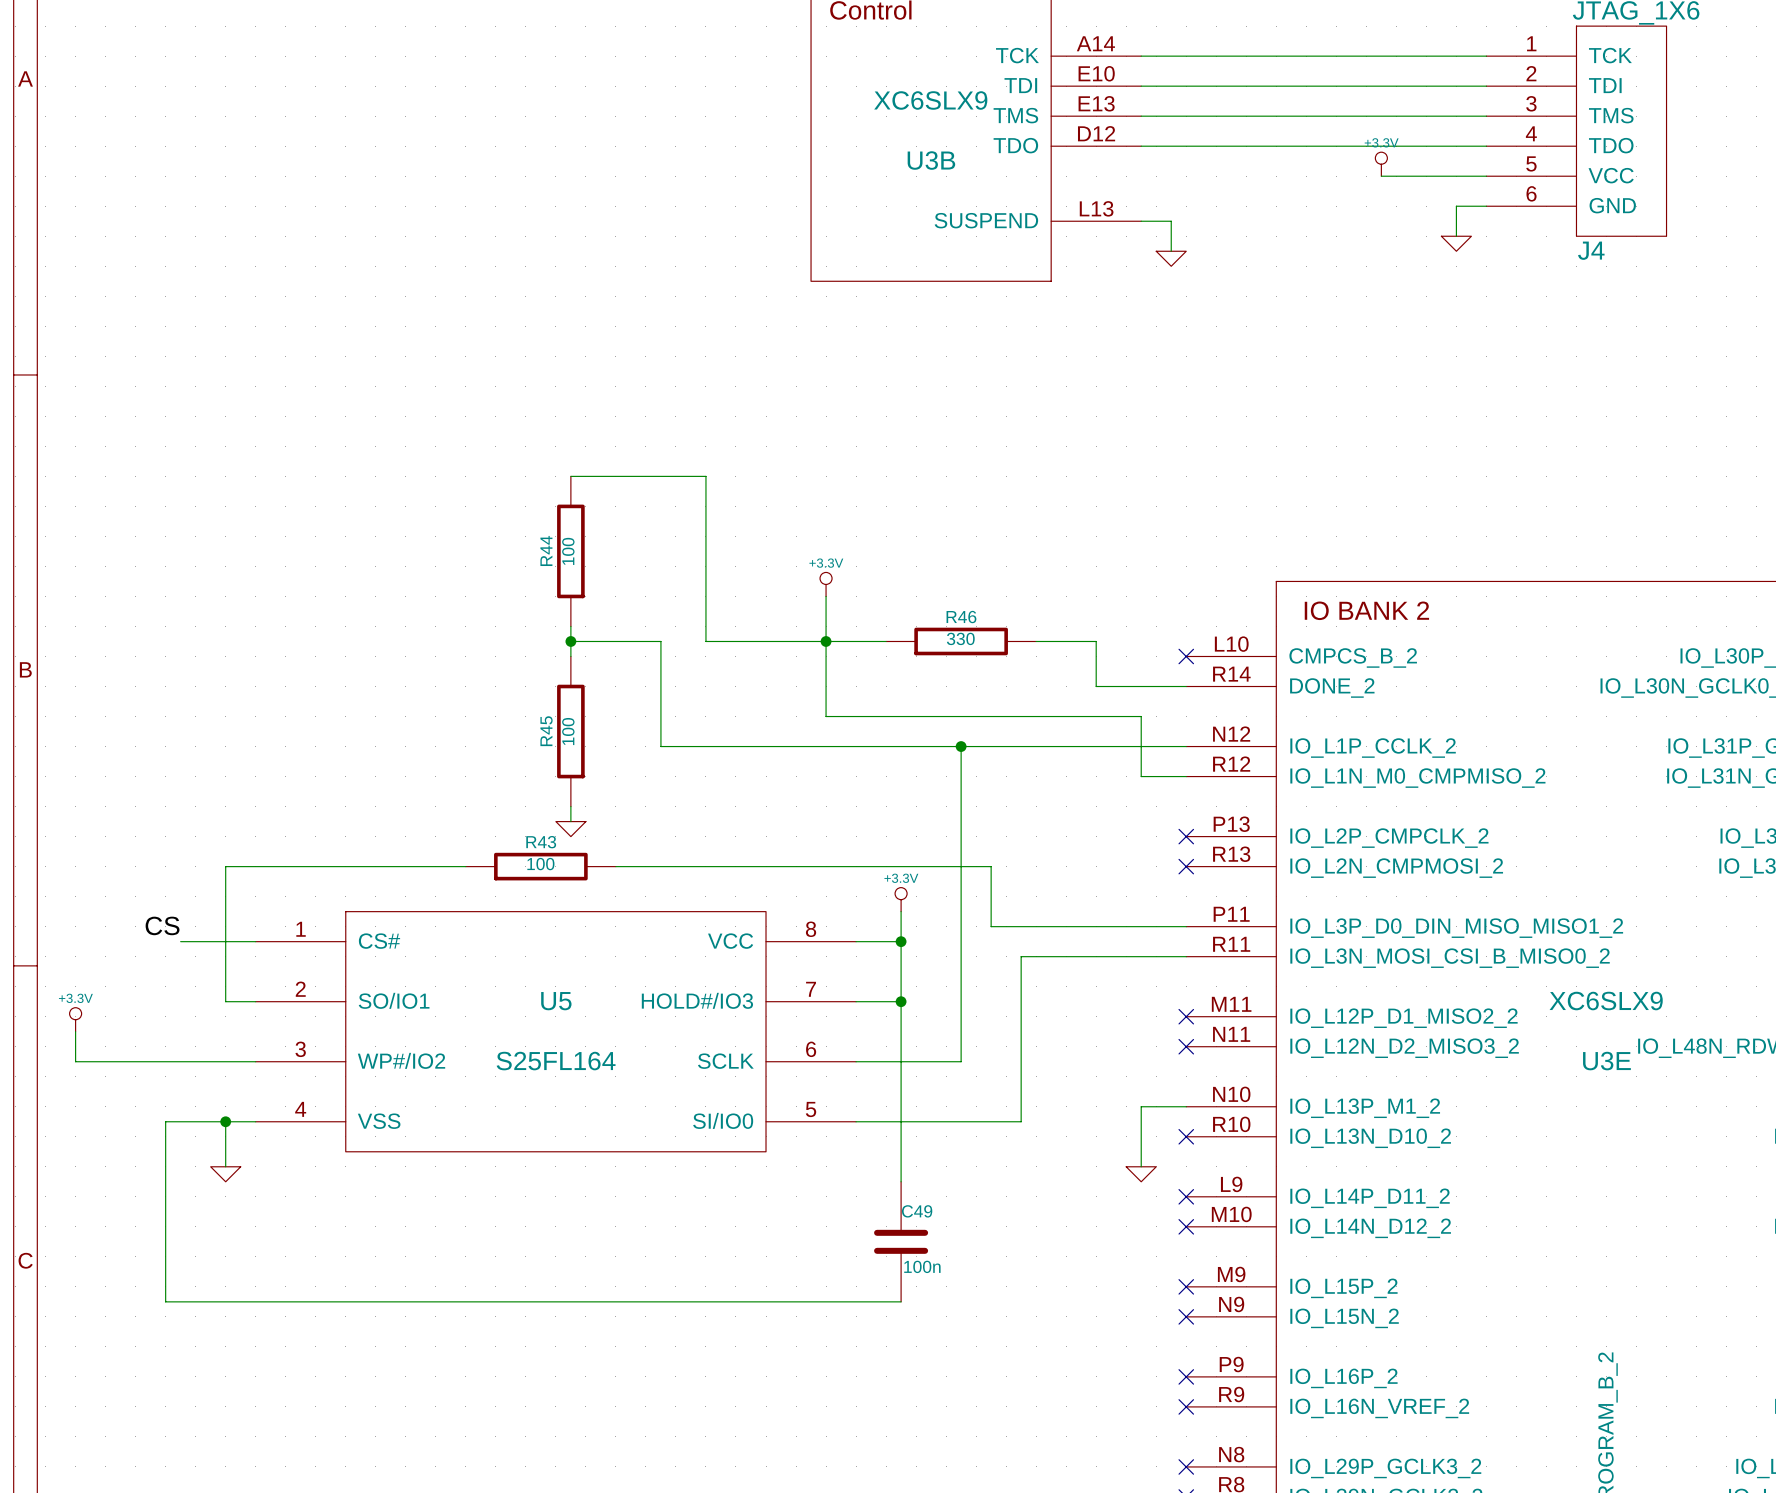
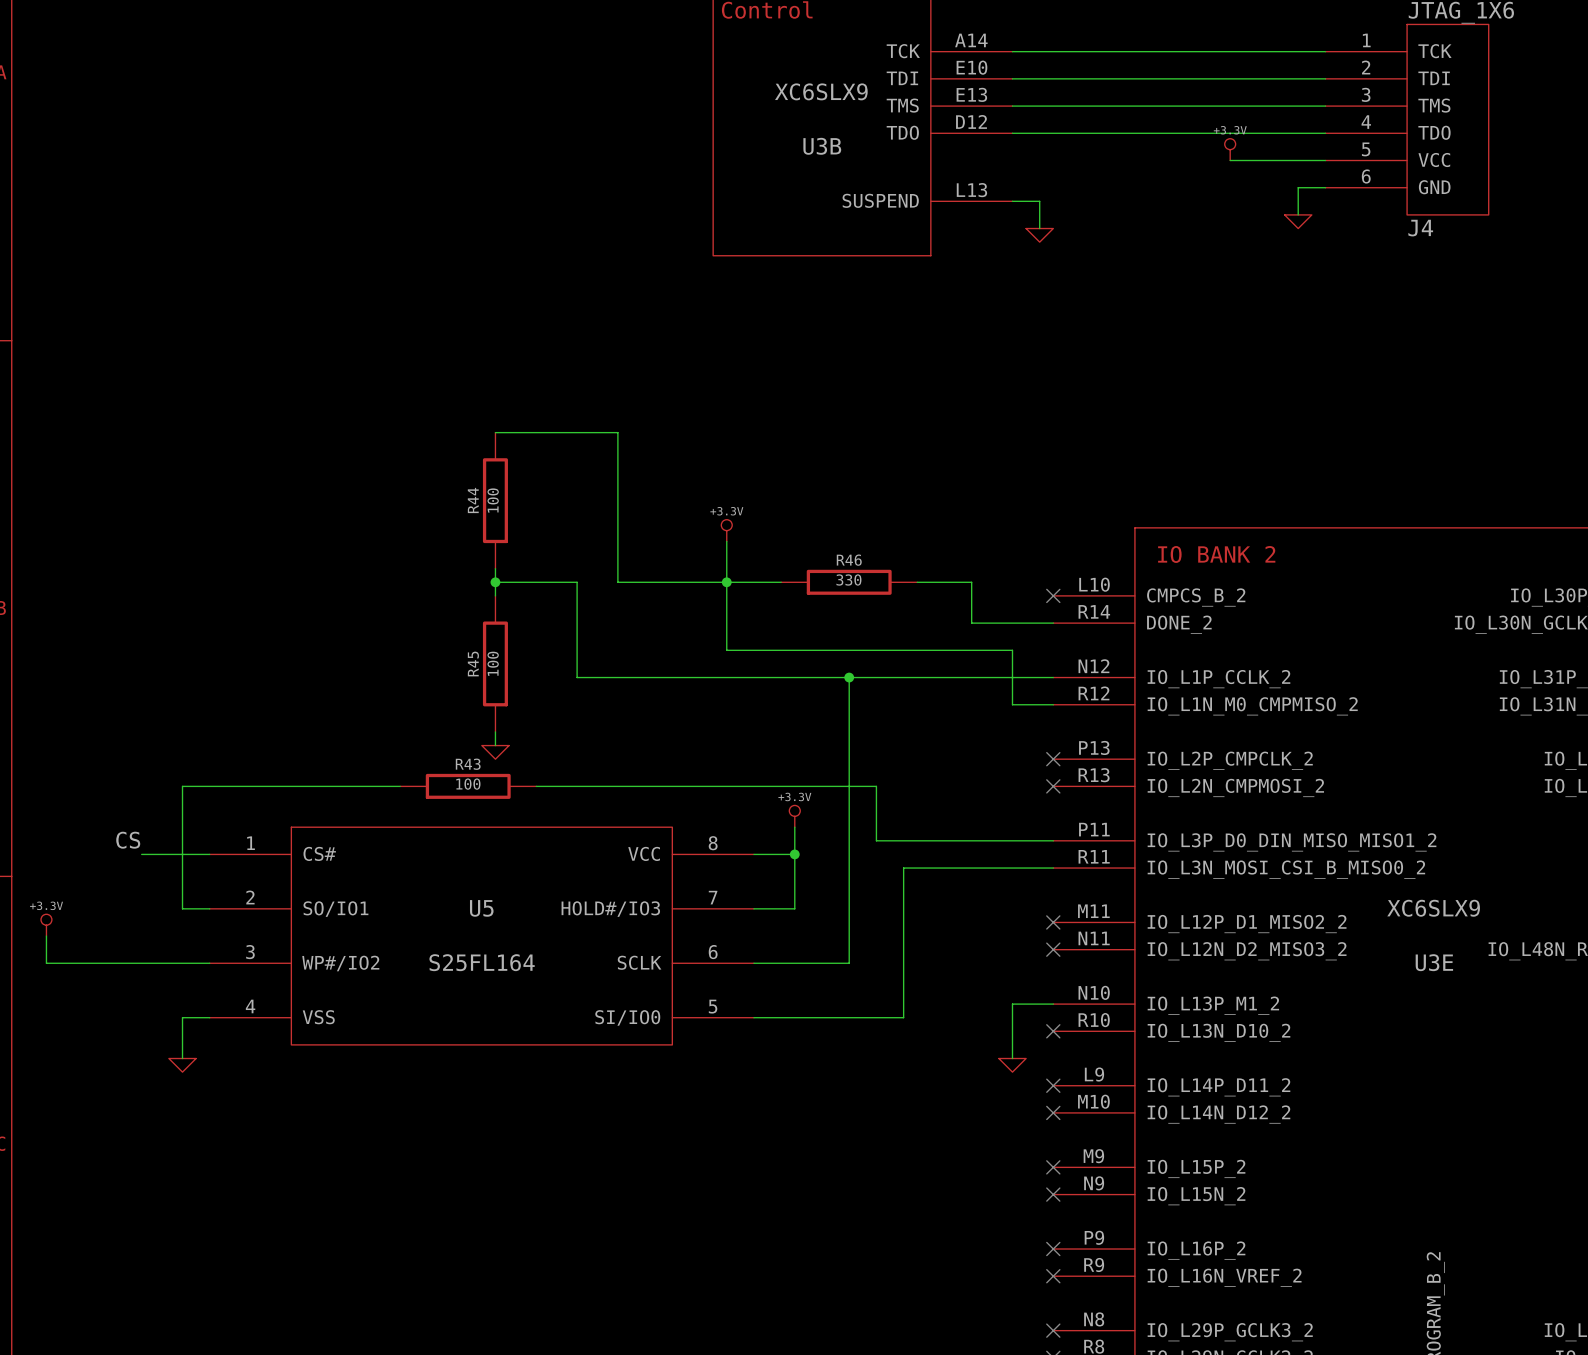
wire: (901, 1001) (901, 1181) -> none
junction: (901, 1001) -> none
wire: (225, 1121) (165, 1121) (165, 1301) (901, 1301) -> none
junction: (225, 1121) -> none
C49: 100n (901, 1241) -> none

